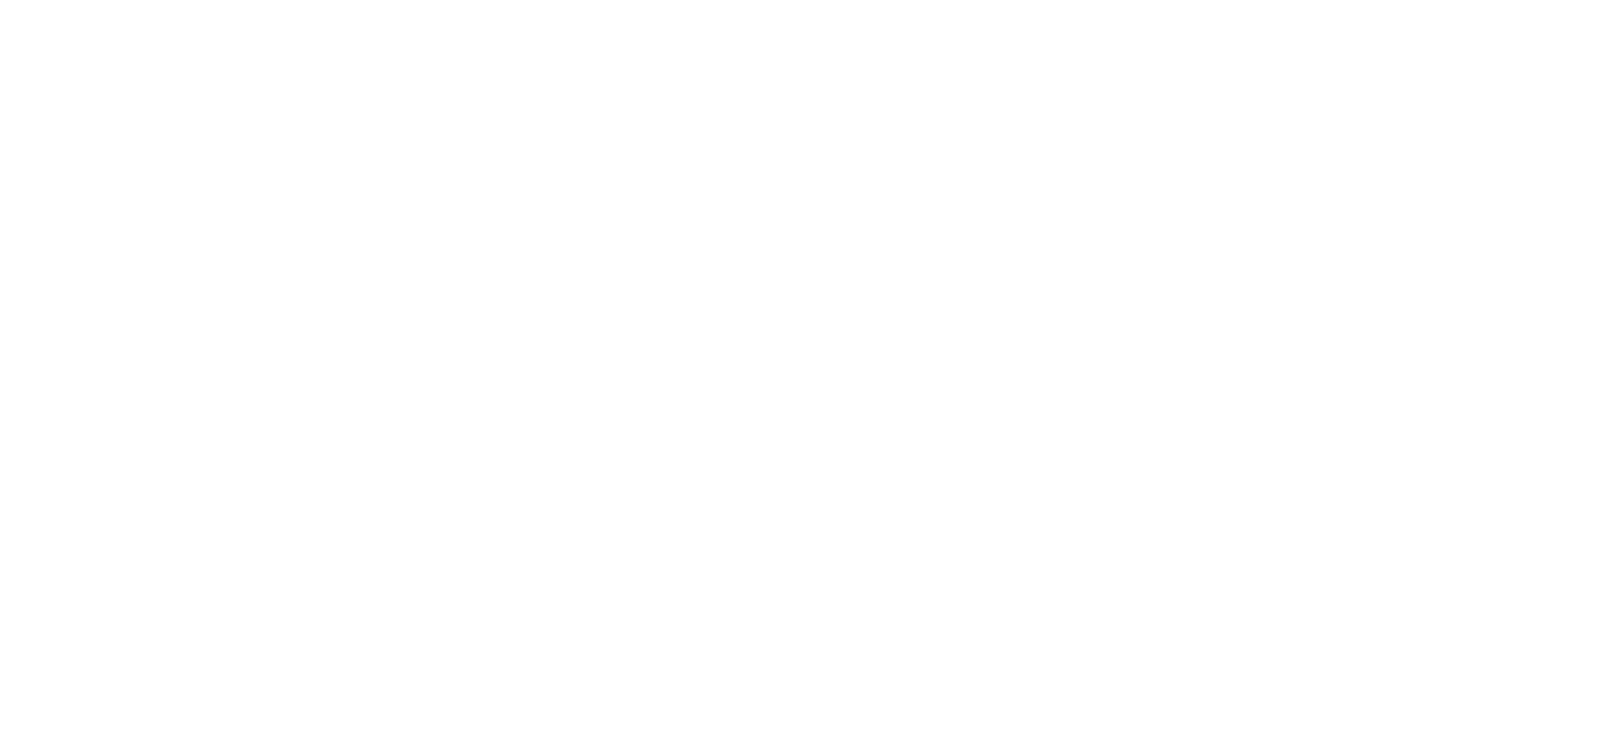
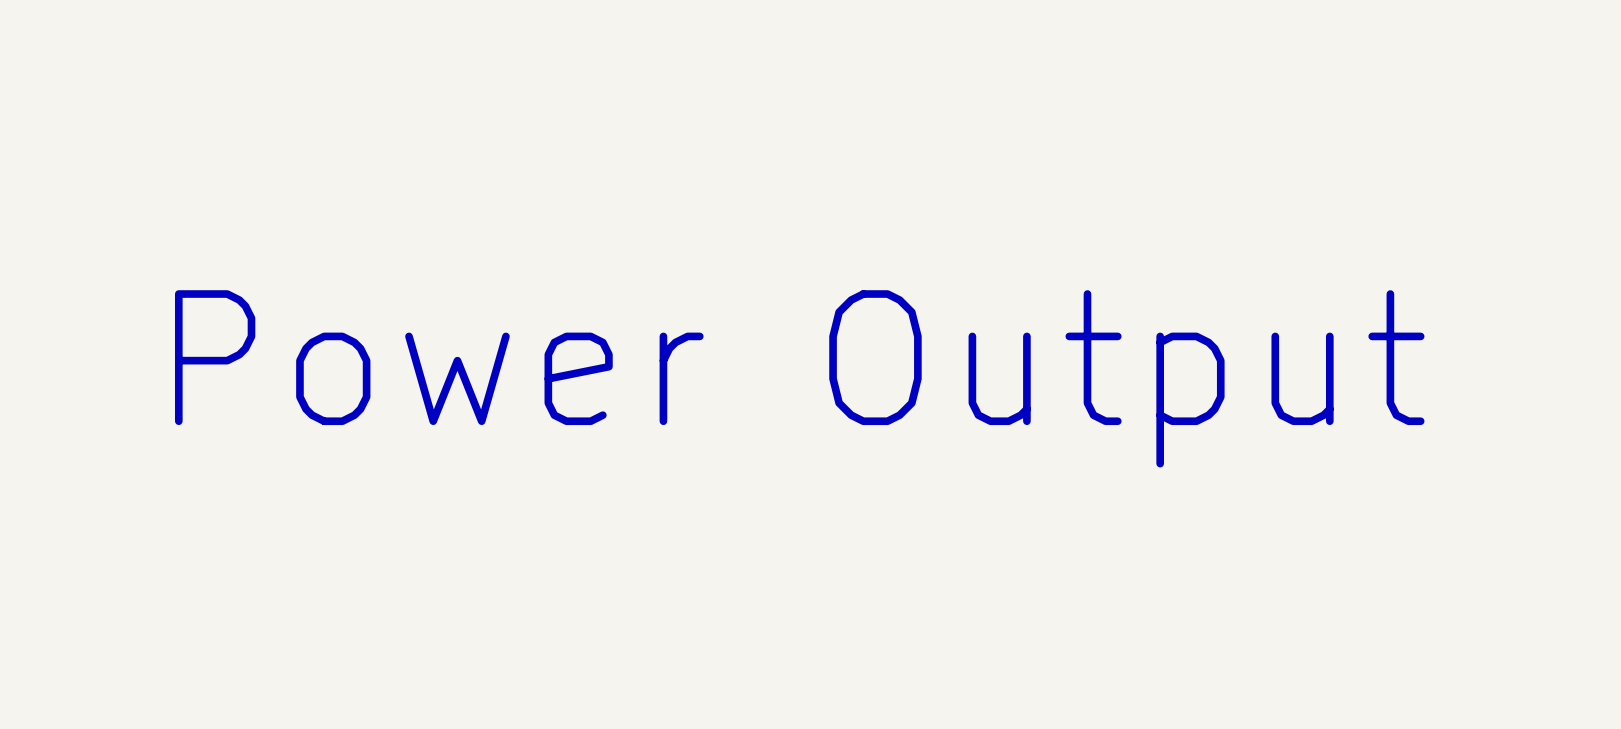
text: none -> Power Output (799, 378)

